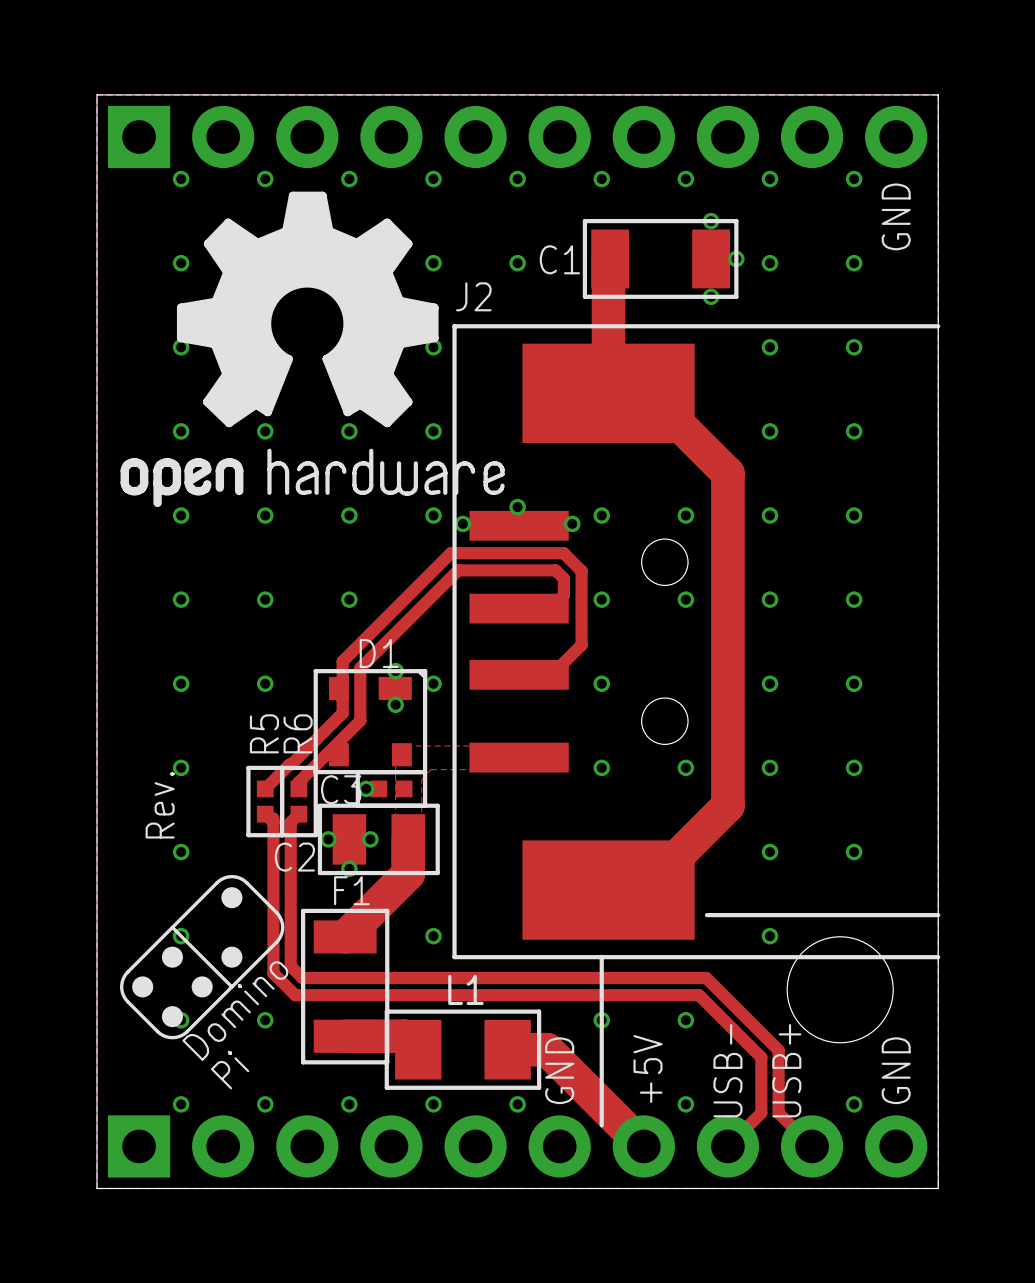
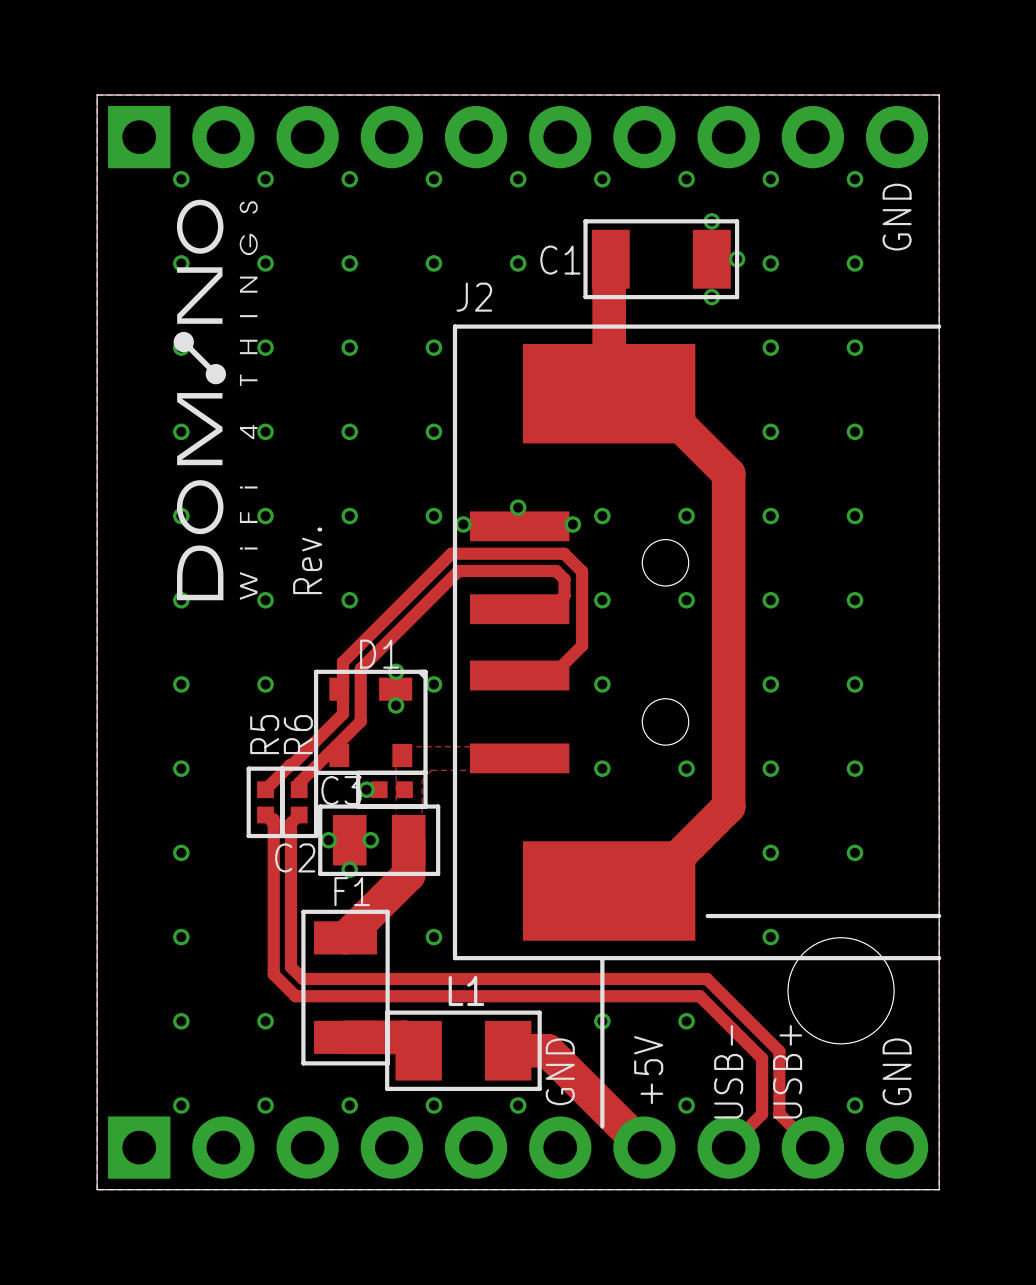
drawing: [120, 191, 505, 508] -> none
drawing: none -> [173, 199, 258, 601]
text position: Rev. (160, 805) -> Rev. (307, 560)
drawing: [119, 874, 285, 1040] -> none

